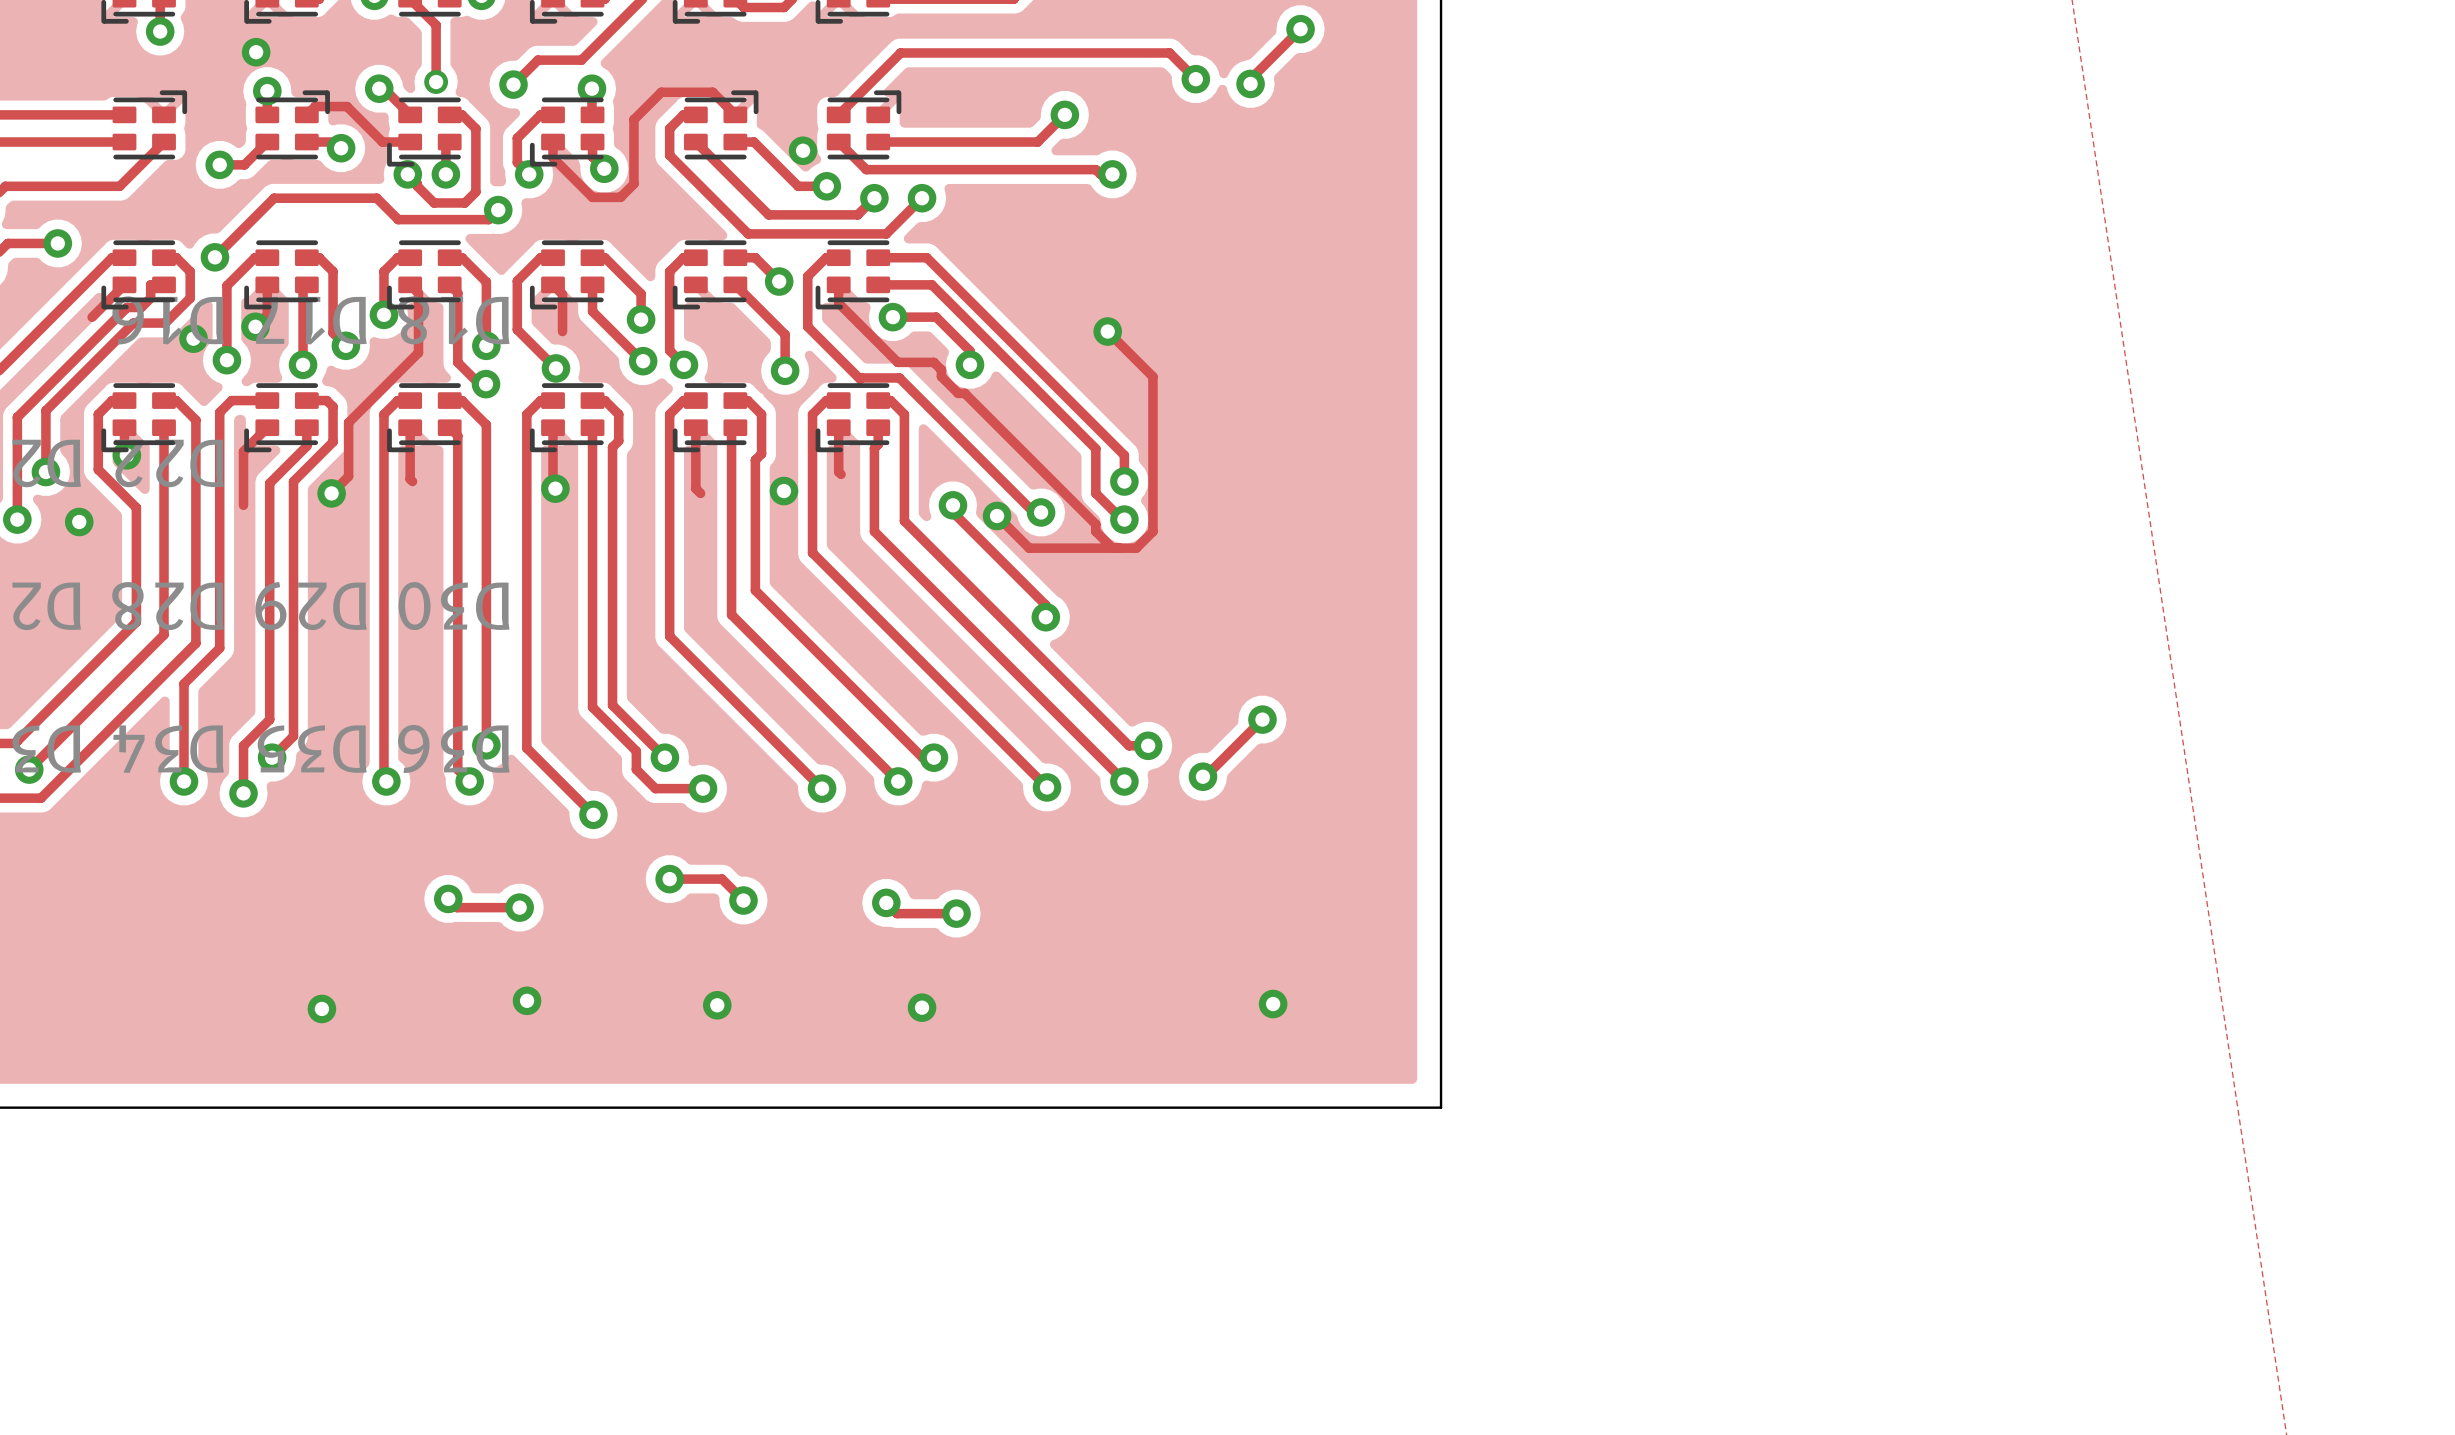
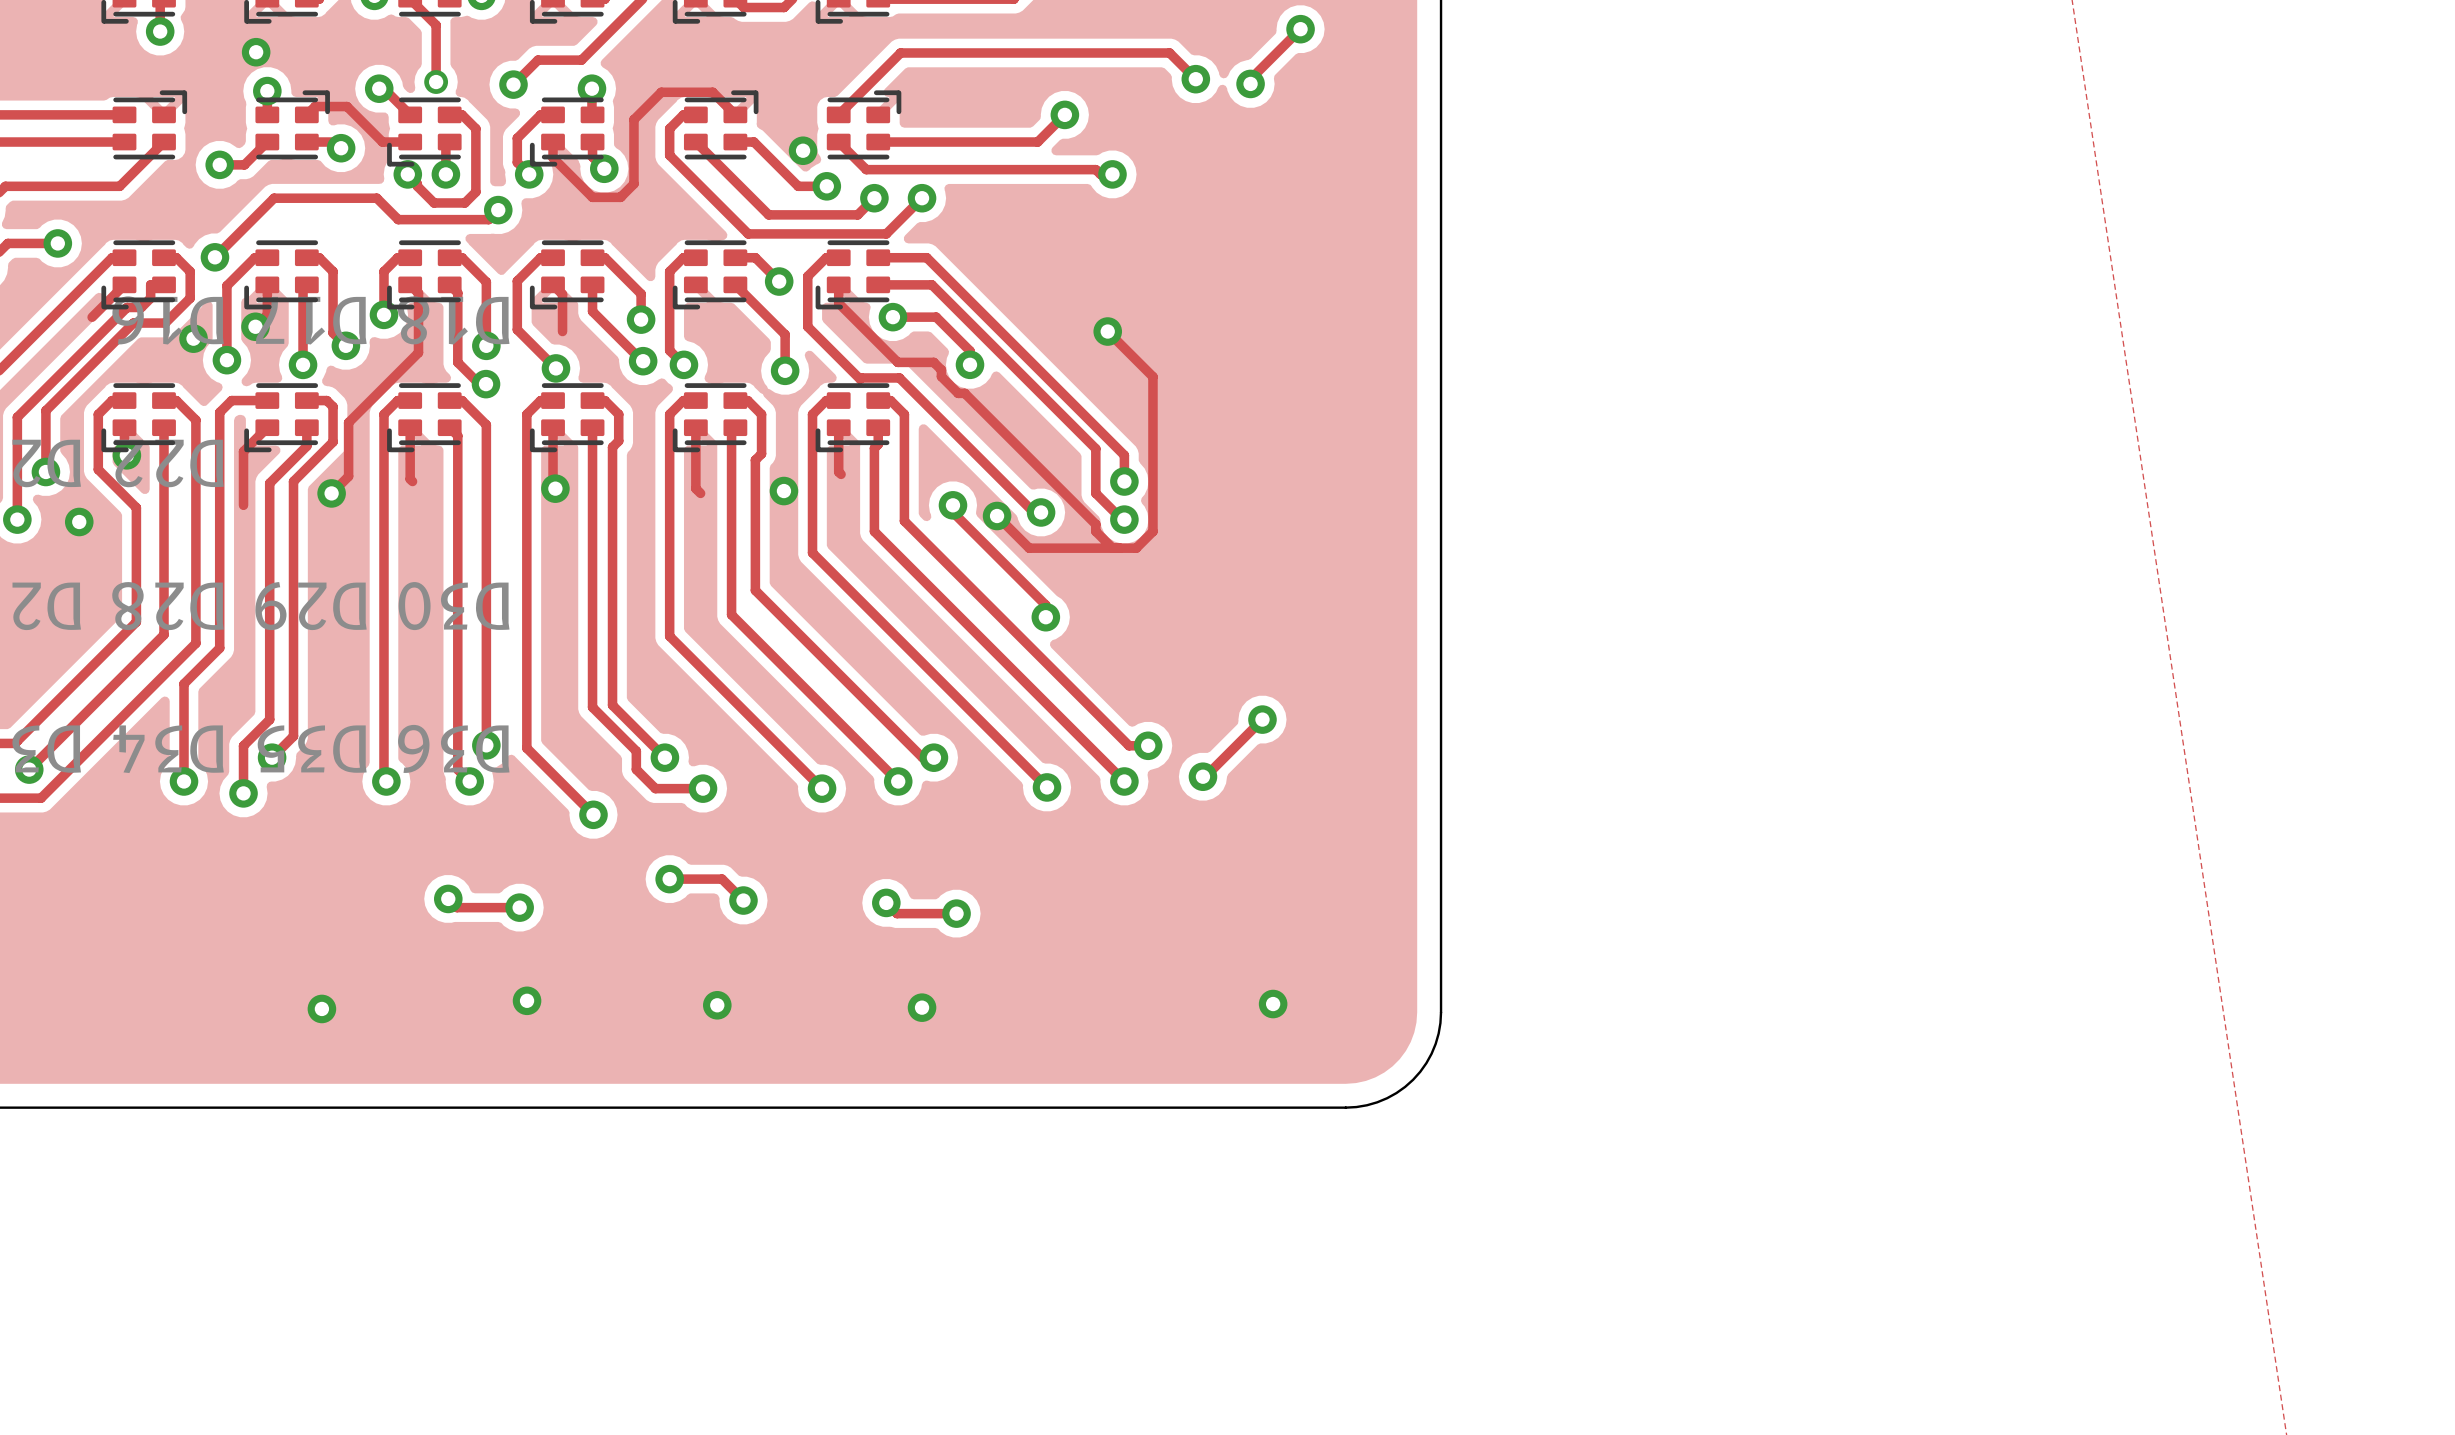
board edge: (1441, 1012) (1441, 1107) (1345, 1107) -> (1441, 1012) (1435, 1043) (1426, 1063) (1413, 1079) (1387, 1098) (1366, 1105) (1345, 1107)

